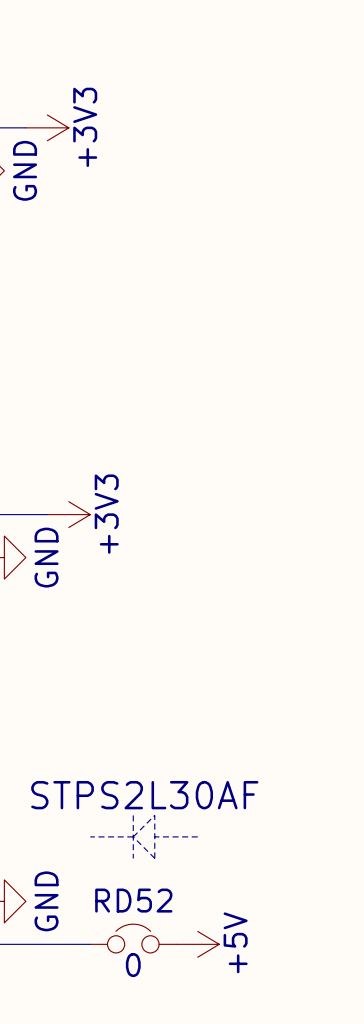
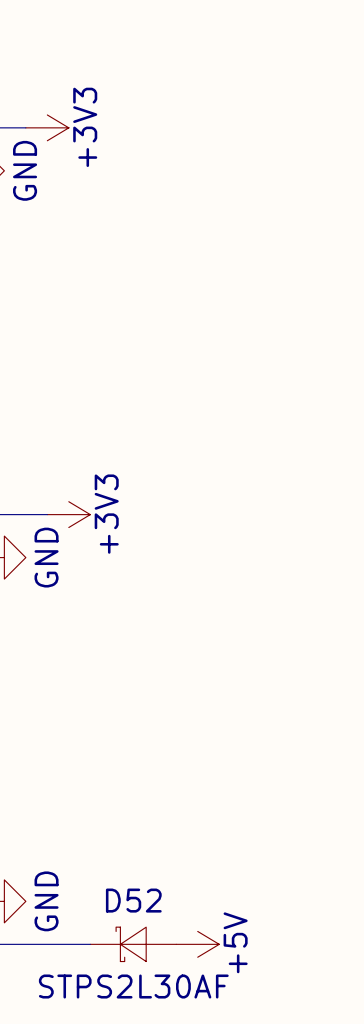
text: STPS2L30AF (144, 795) -> none
line: (133, 815) (133, 858) -> none
line: (90, 836) (133, 836) -> none
line: (133, 836) (154, 858) (154, 815) (133, 836) -> none
line: (154, 836) (197, 836) -> none
RD52: 0 (133, 938) -> none
D52: none -> STPS2L30AF (133, 944)

